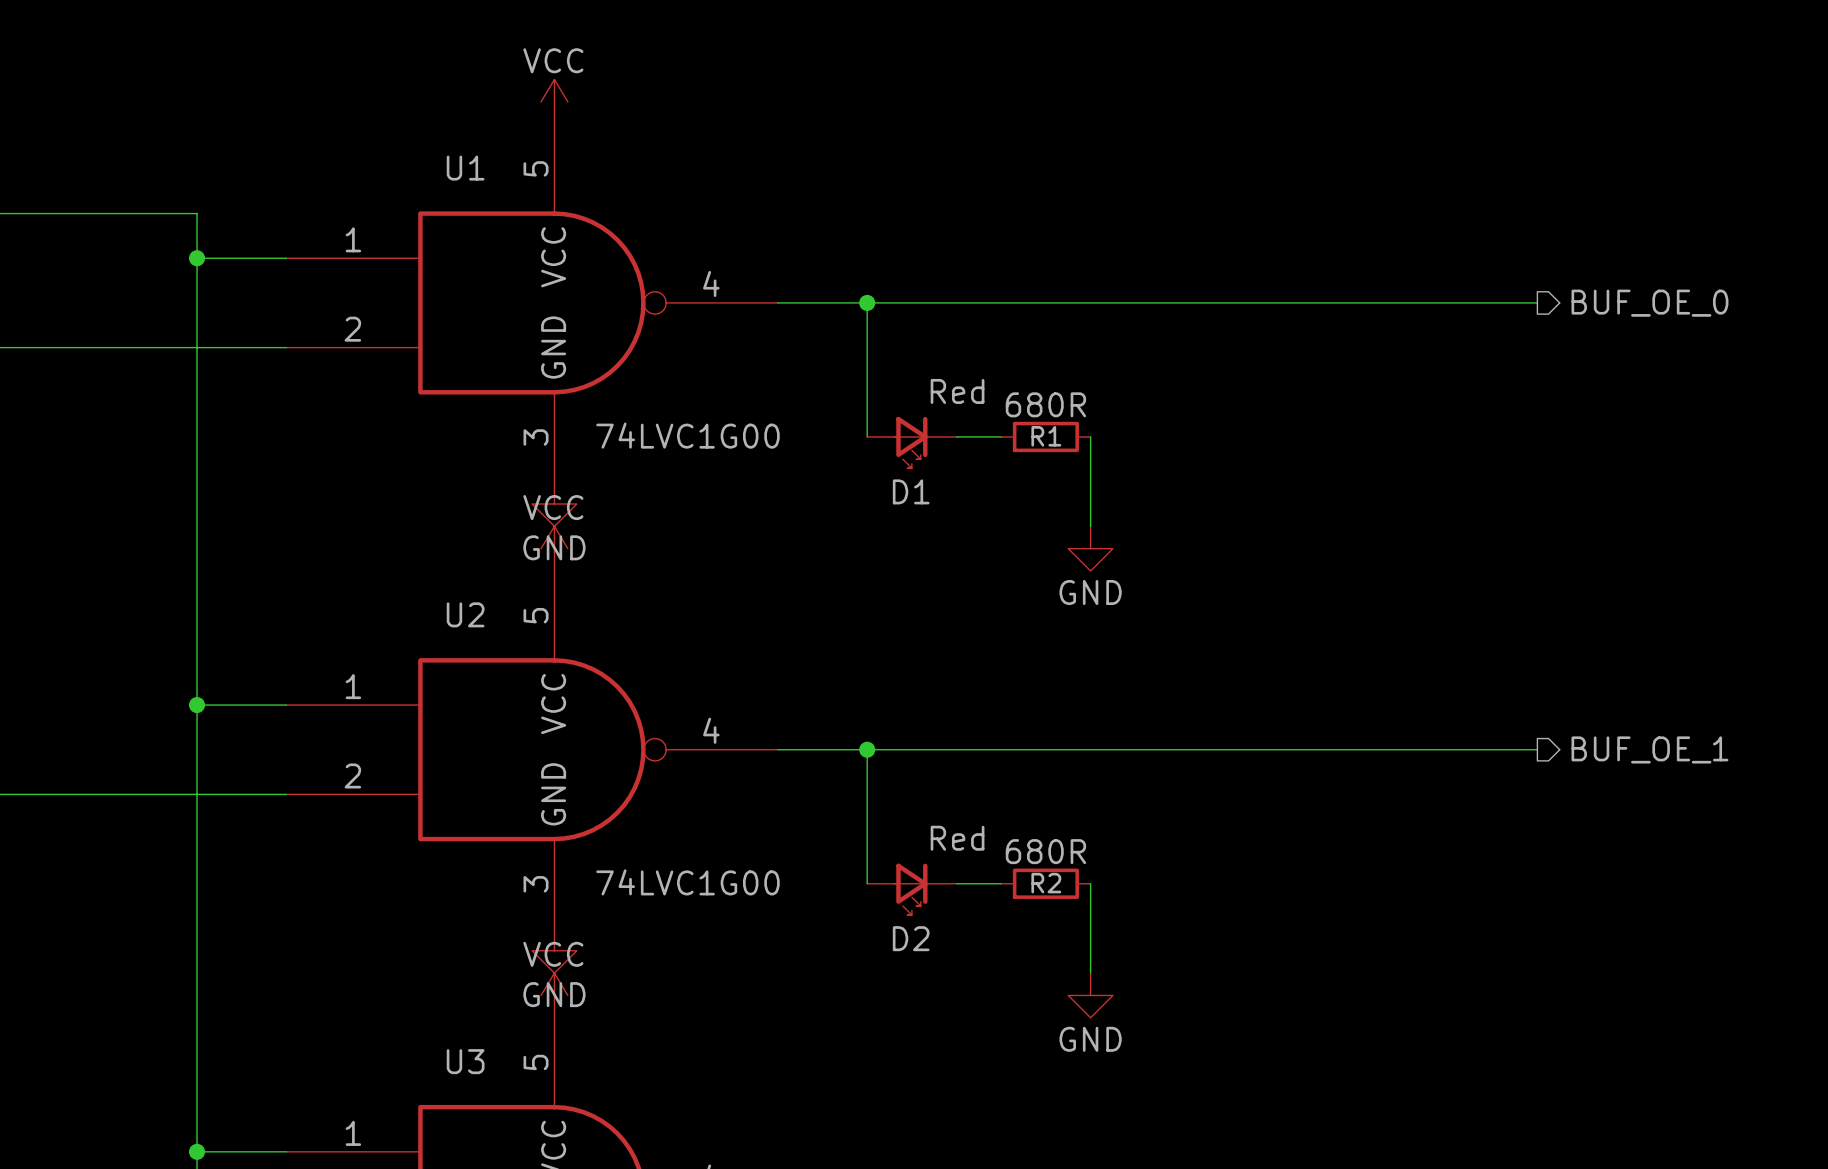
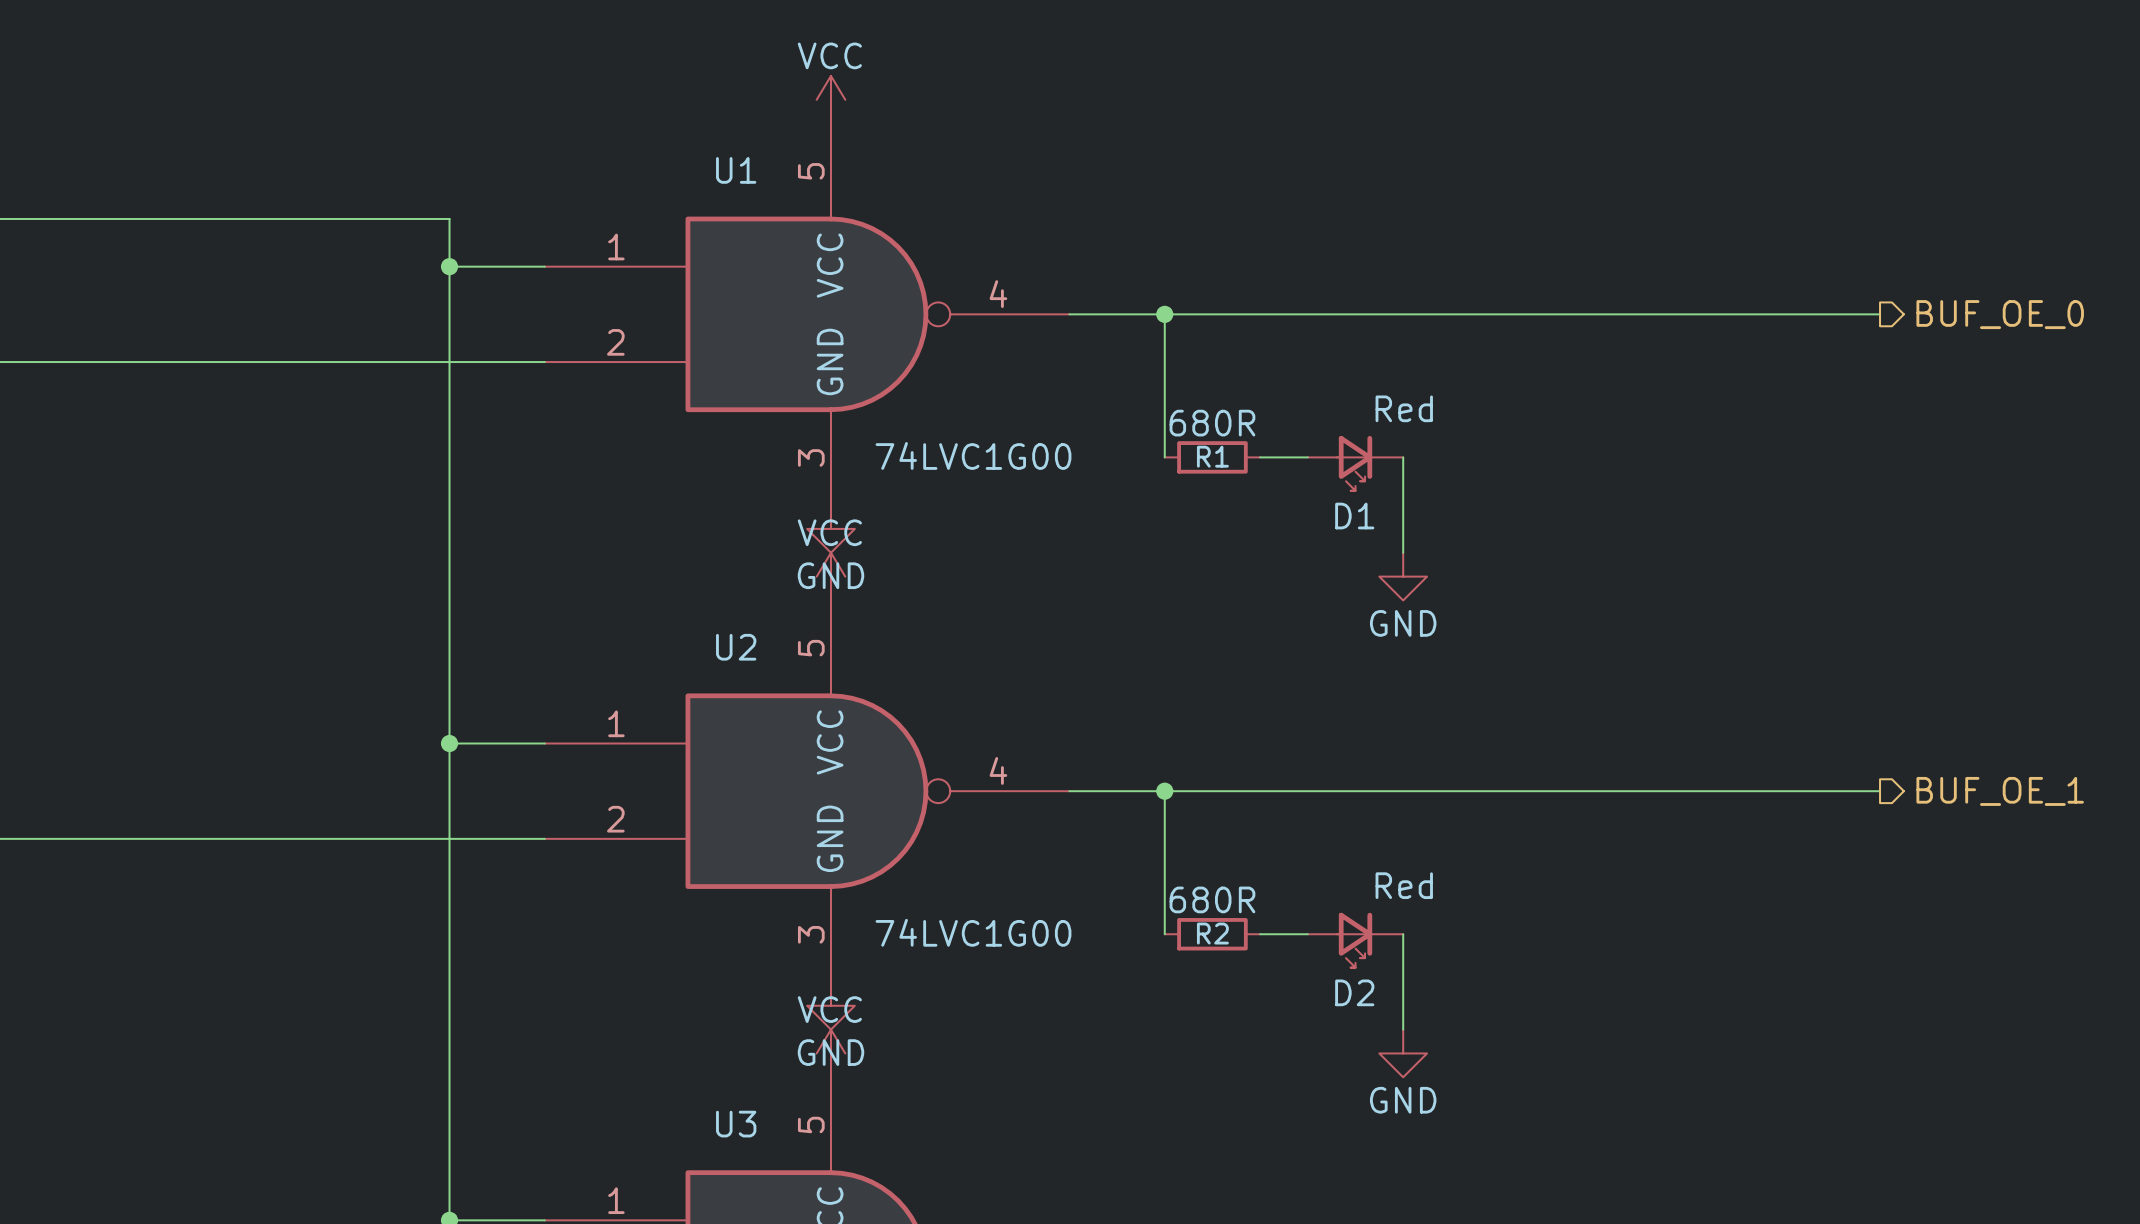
R1 position: (1045, 436) -> (1212, 457)
D1 position: (911, 442) -> (1355, 463)
R2 position: (1045, 883) -> (1212, 934)
D2 position: (911, 889) -> (1355, 940)

